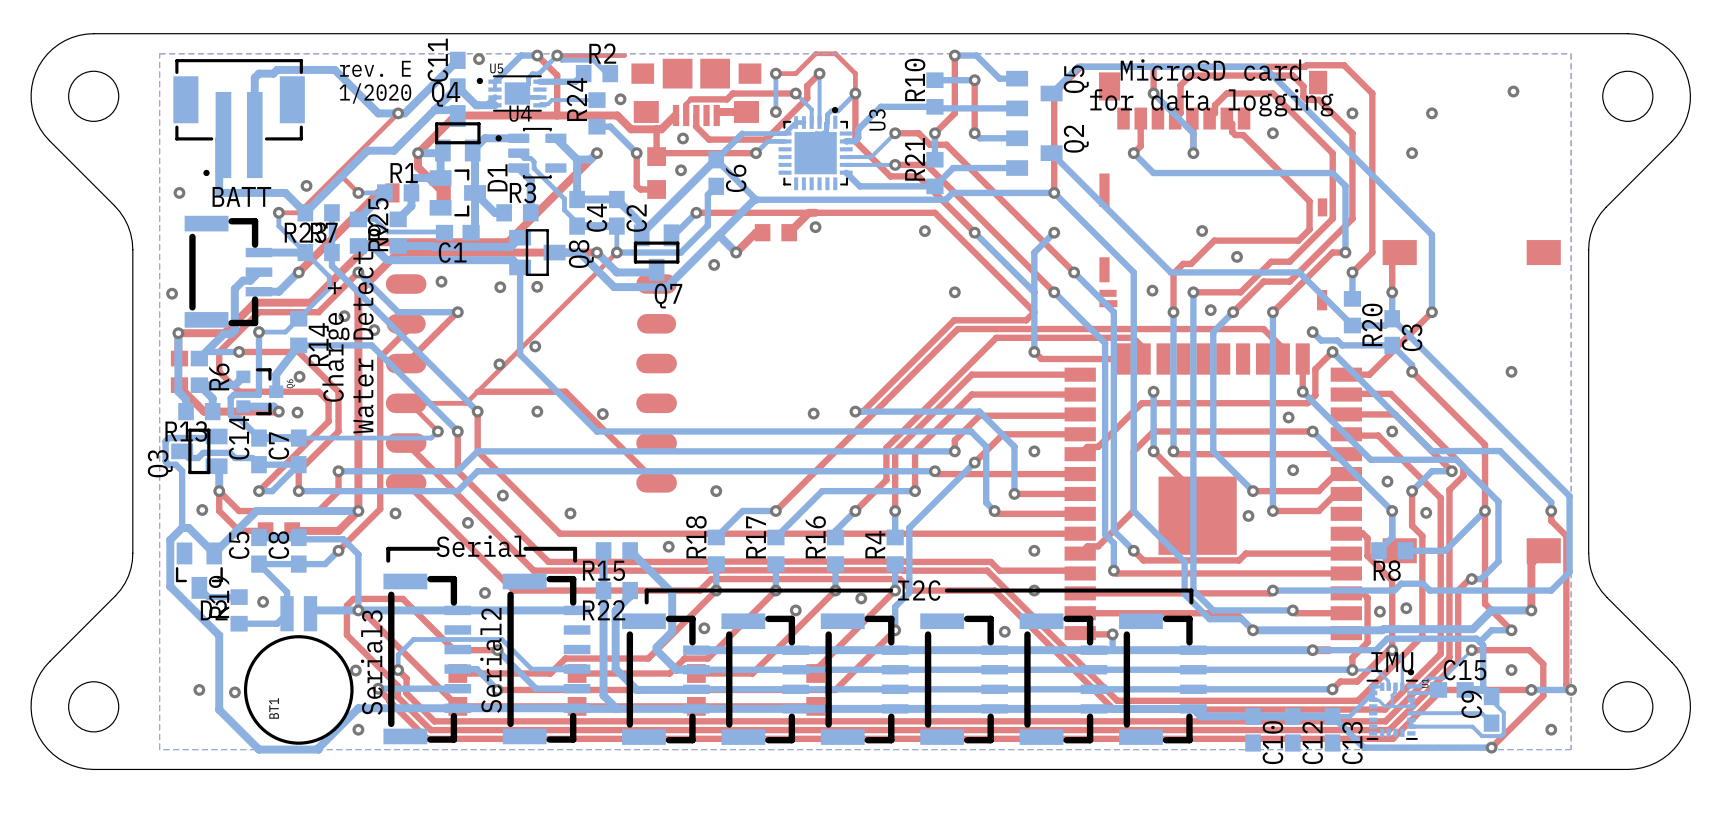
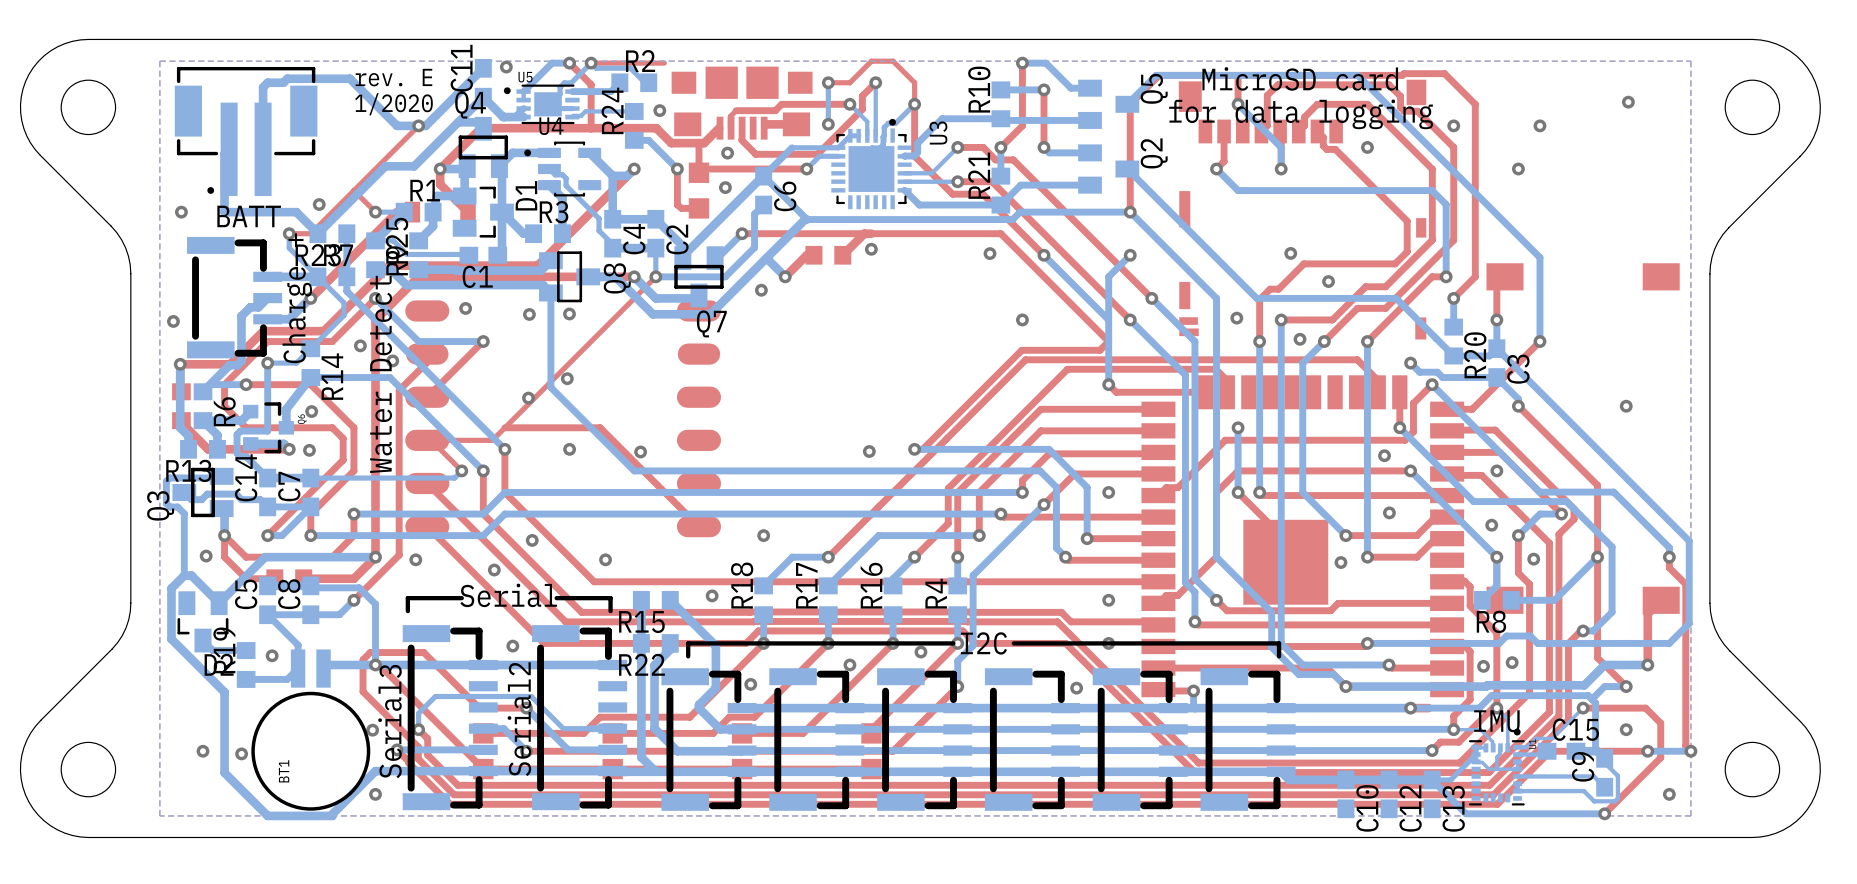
text position: Charge + (335, 341) -> Charge + (297, 298)

